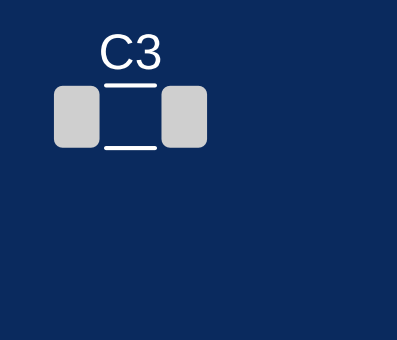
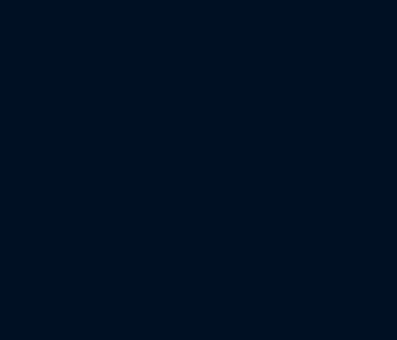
C3: (130, 116) -> none

